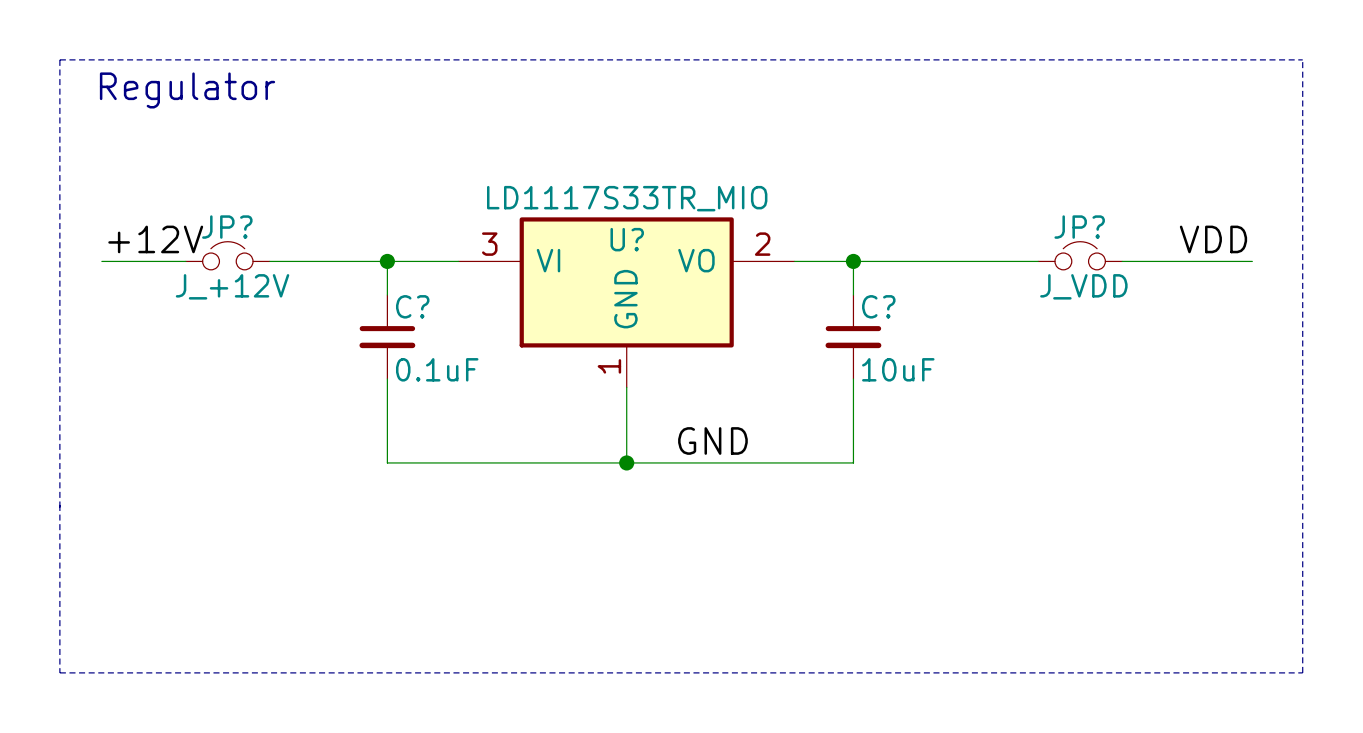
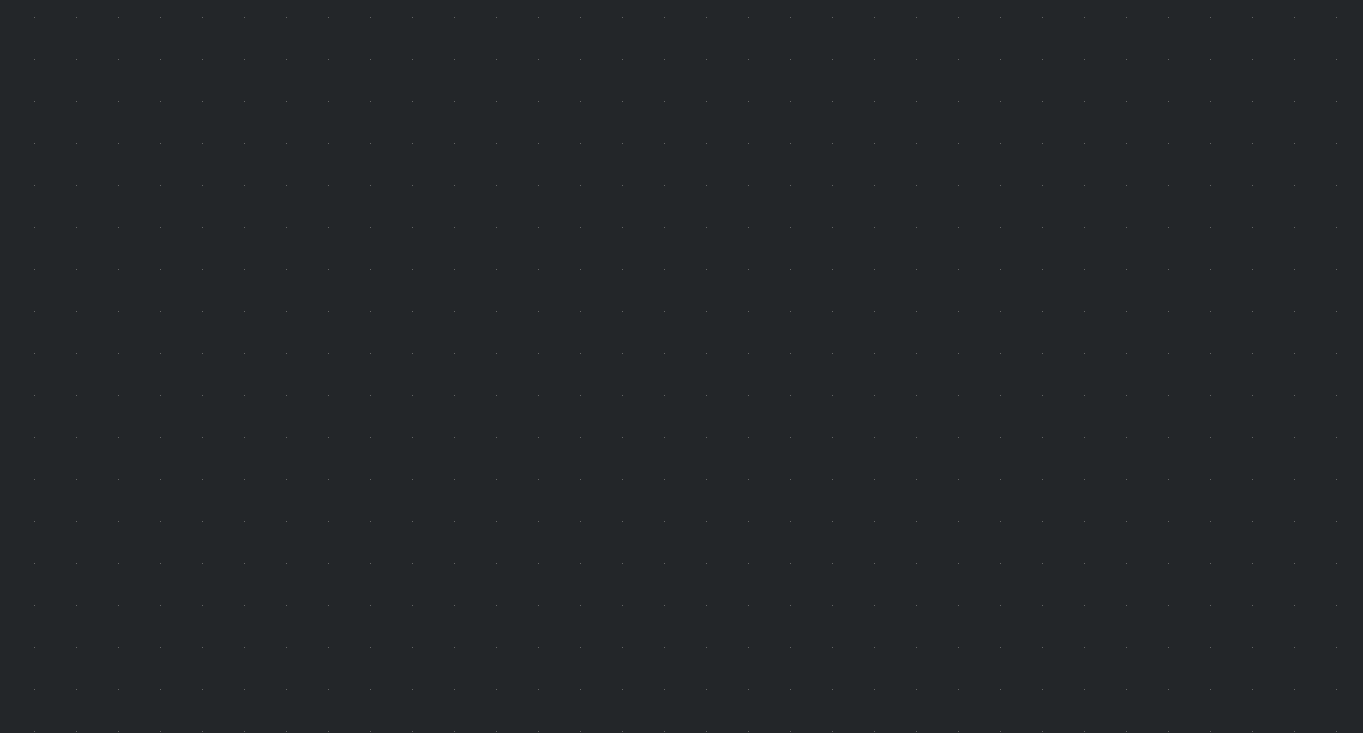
line: (59, 59) (59, 672) (1302, 672) (1302, 59) (59, 59) -> none
text: Regulator (187, 90) -> none
label: +12V (155, 239) -> none
label: VDD (1213, 239) -> none
JP?: J_+12V (227, 255) -> none
JP?: J_VDD (1080, 255) -> none
wire: (101, 261) (185, 261) -> none
wire: (269, 261) (458, 261) -> none
wire: (387, 261) (387, 295) -> none
junction: (387, 261) -> none
wire: (794, 261) (1038, 261) -> none
wire: (853, 261) (853, 295) -> none
junction: (853, 261) -> none
wire: (1122, 261) (1252, 261) -> none
U?: LD1117S33TR_MIO (626, 302) -> none
C?: 0.1uF (387, 337) -> none
C?: 10uF (853, 337) -> none
wire: (387, 378) (387, 462) (853, 462) (853, 378) -> none
wire: (626, 387) (626, 462) -> none
label: GND (712, 440) -> none
junction: (626, 462) -> none

